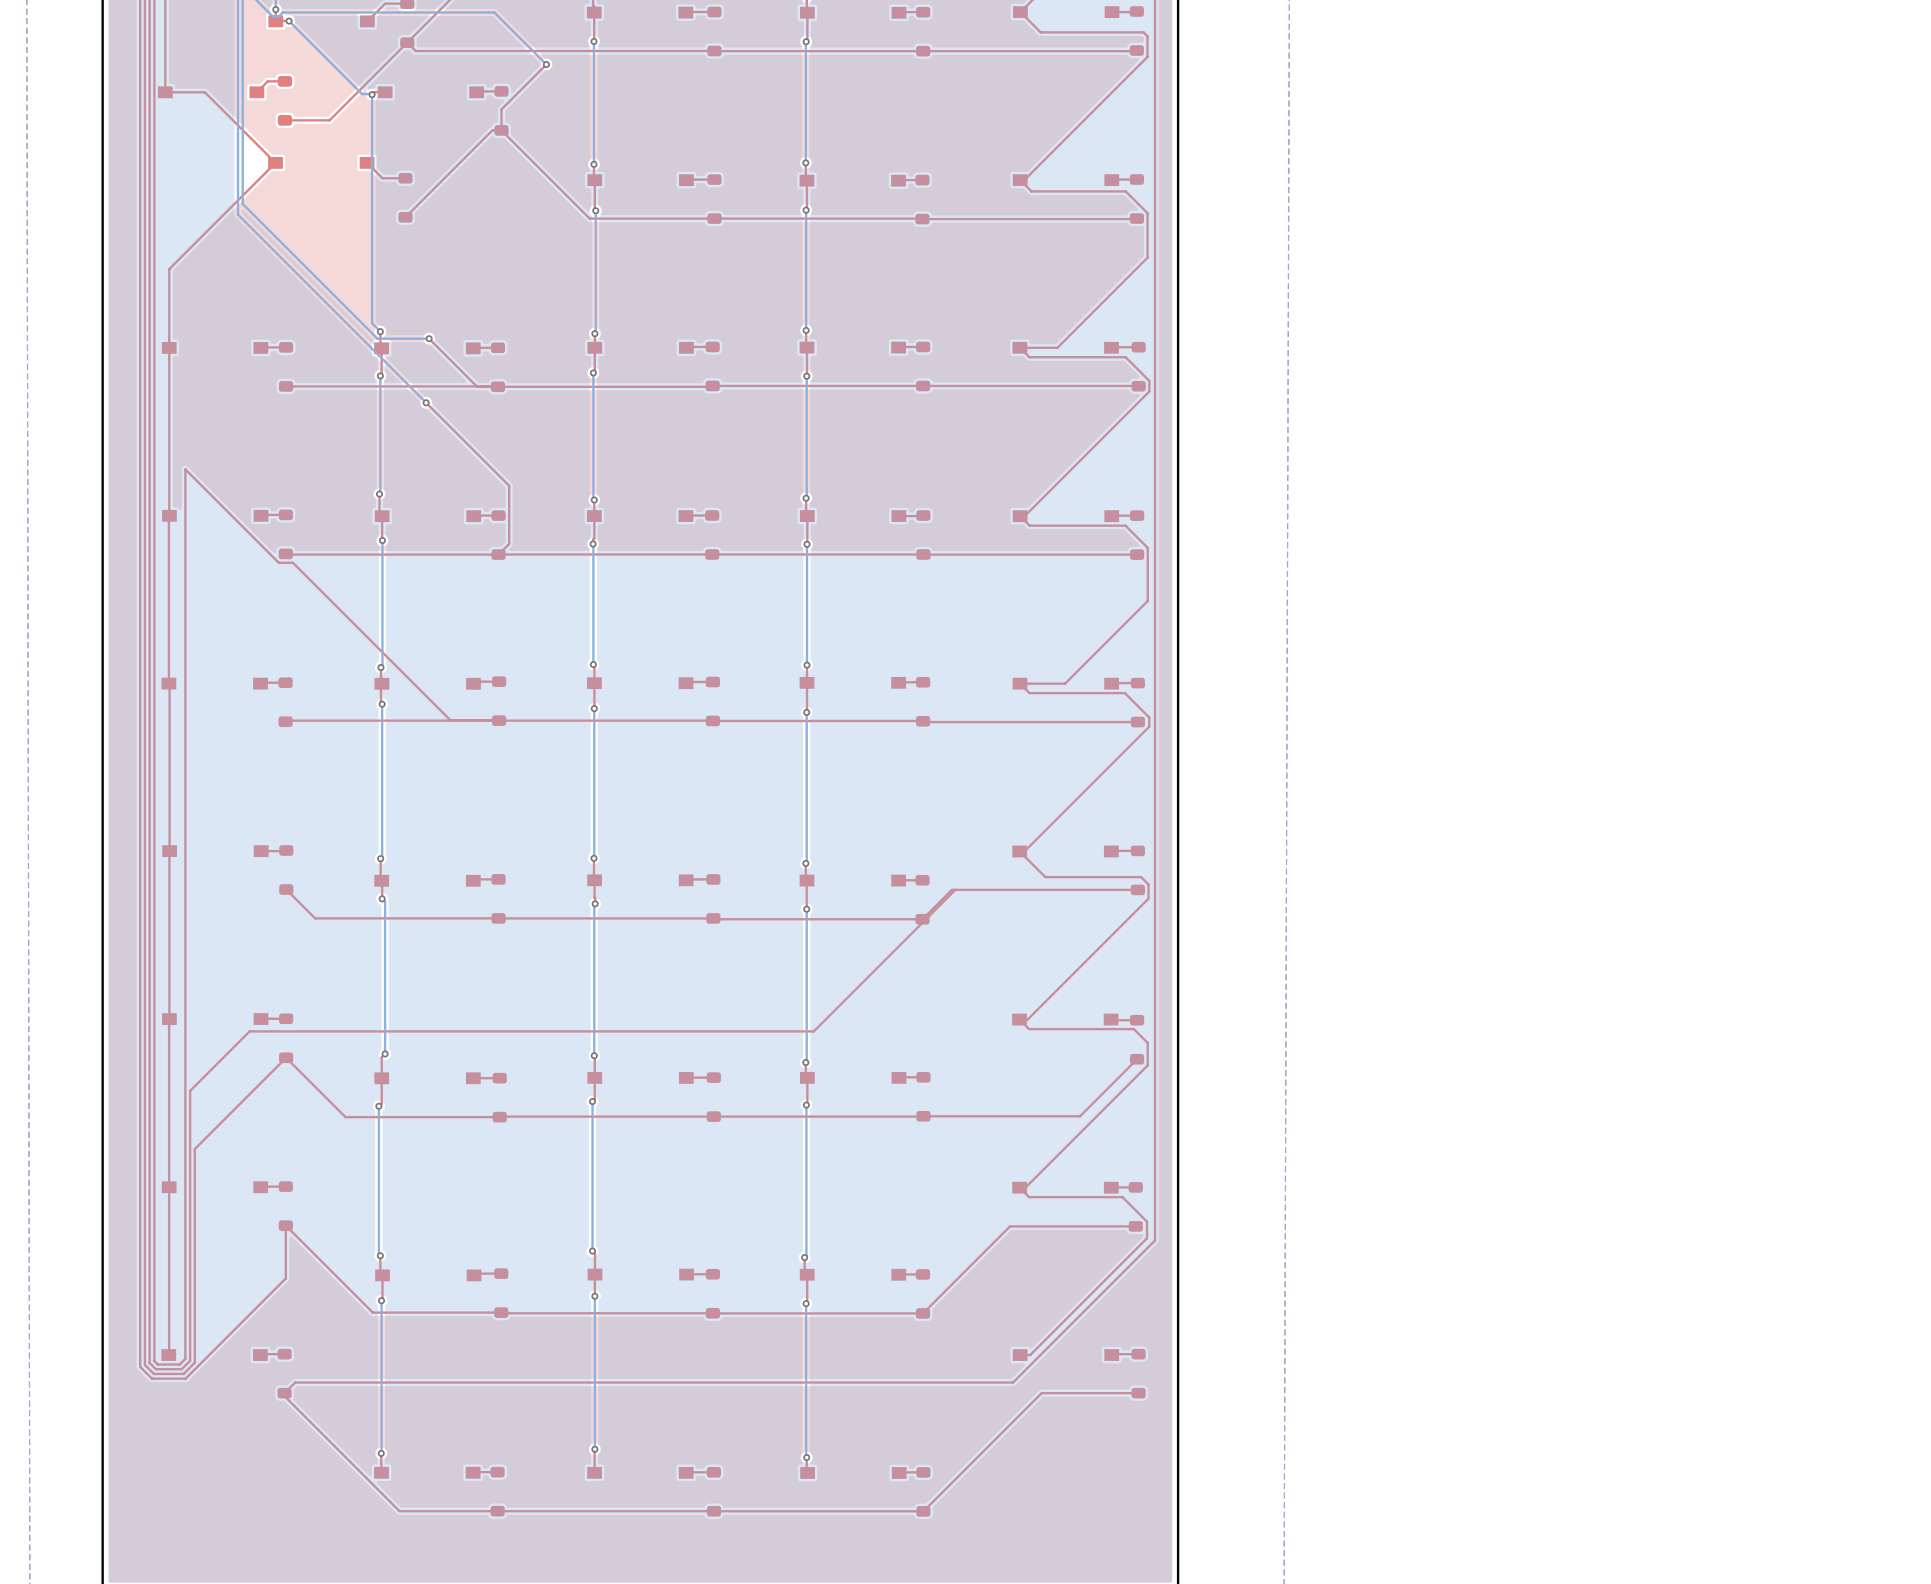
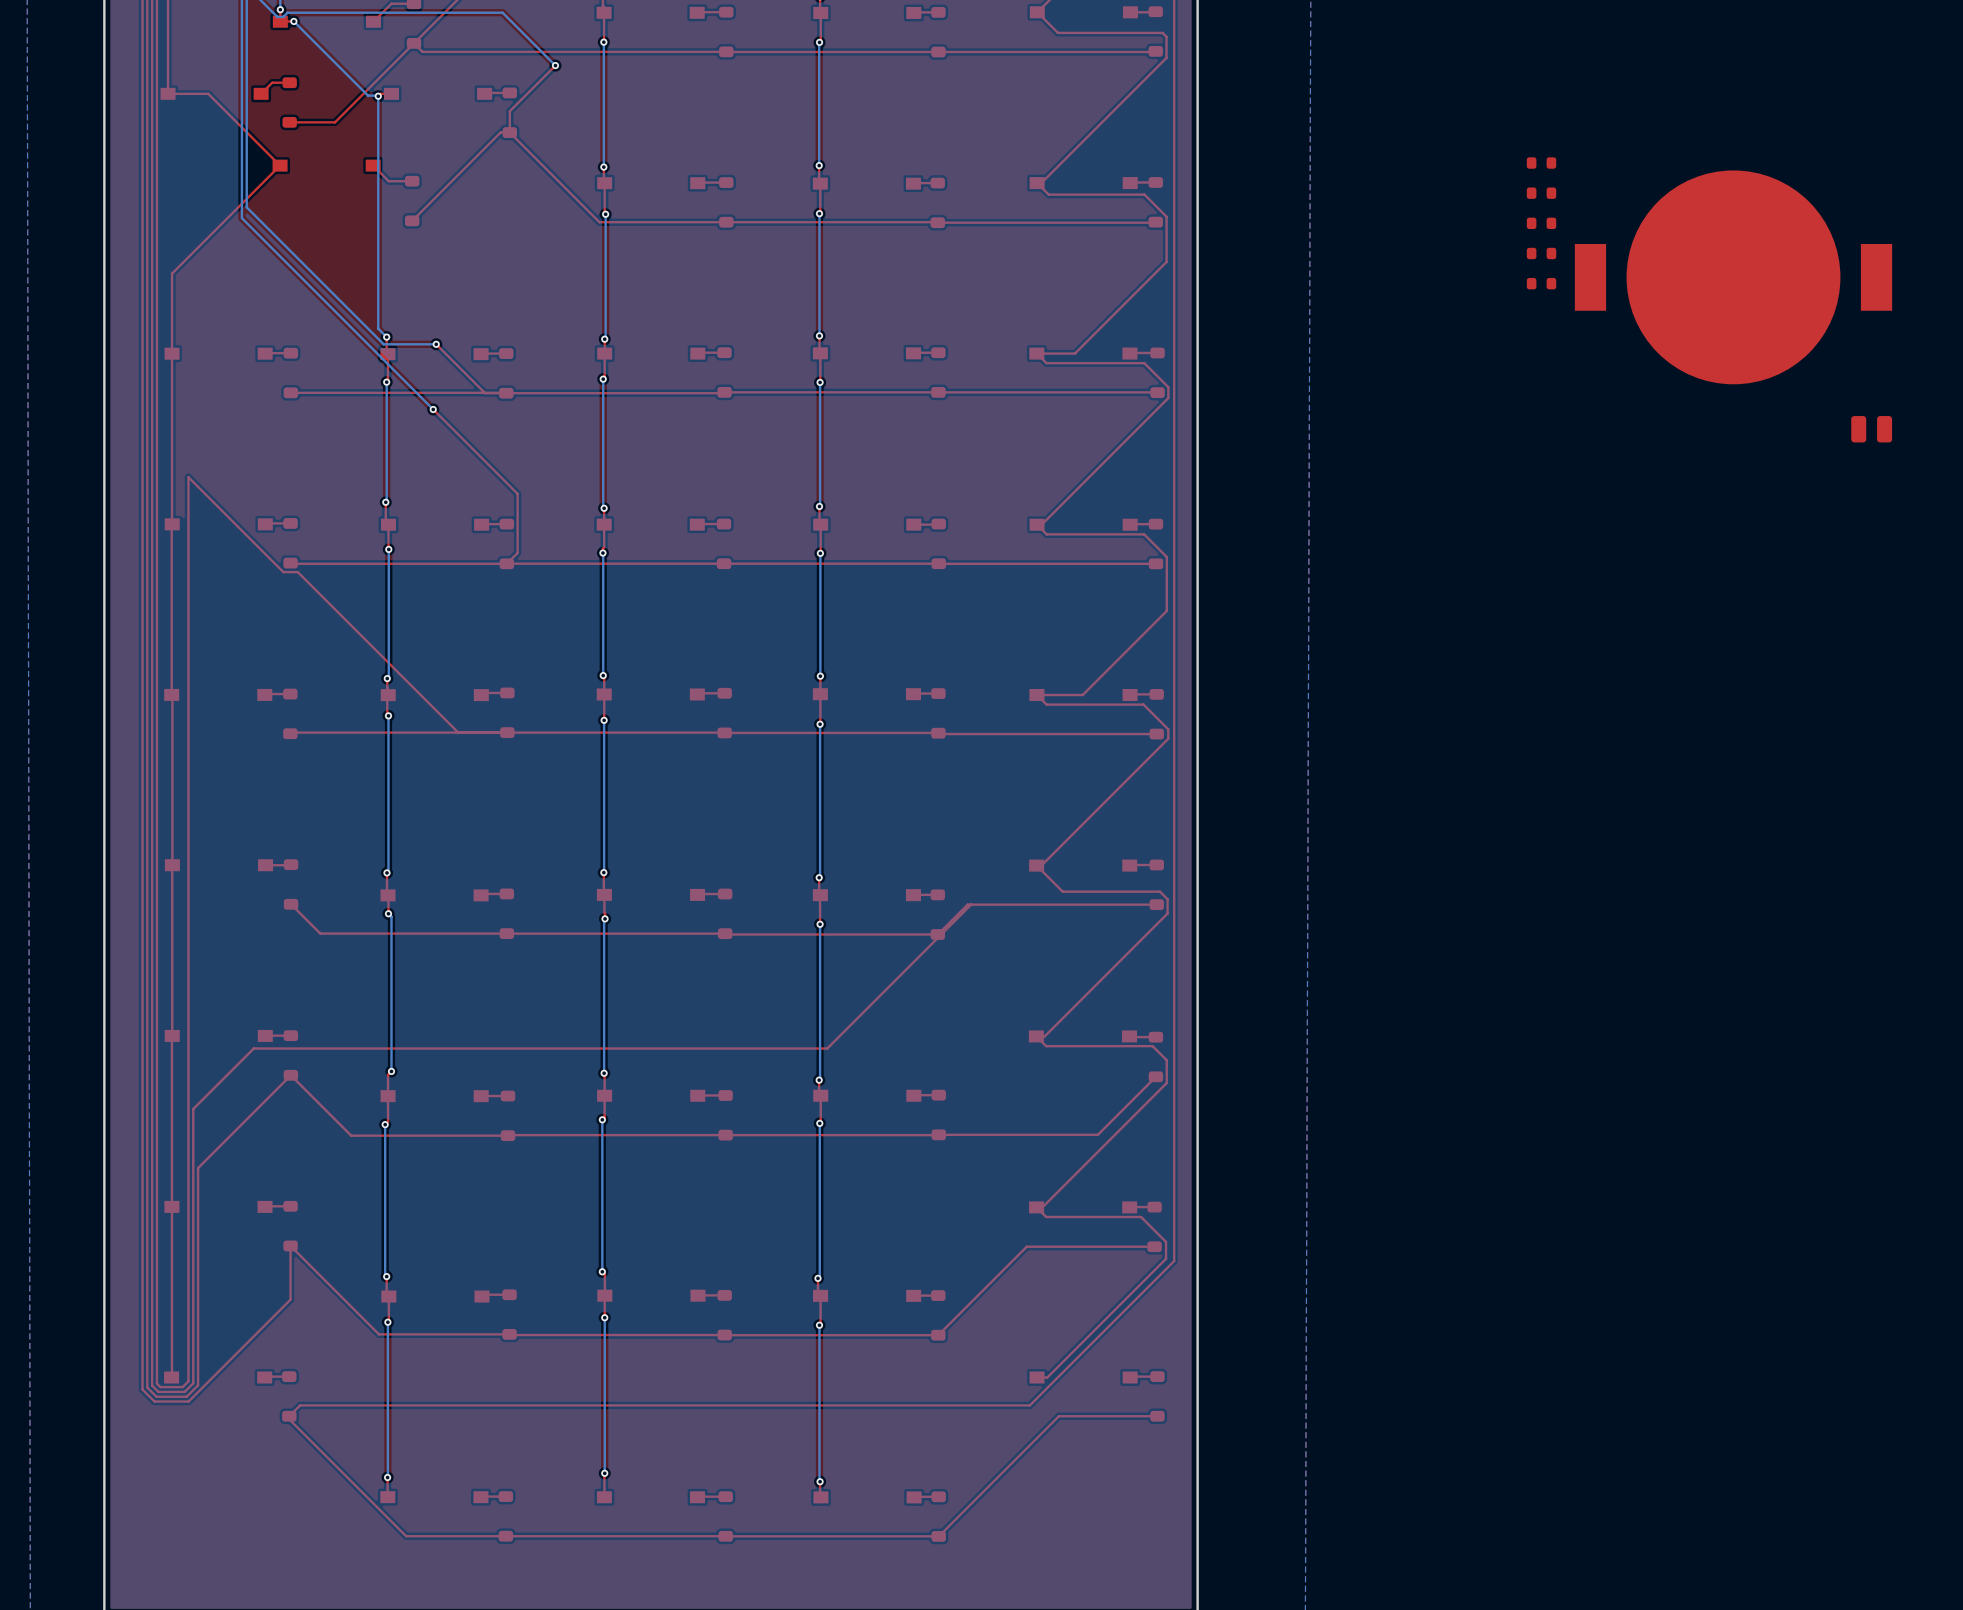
part: none -> (1541, 163)
part: none -> (1541, 193)
part: none -> (1541, 223)
part: none -> (1541, 253)
part: none -> (1733, 277)
part: none -> (1541, 283)
part: none -> (1871, 429)

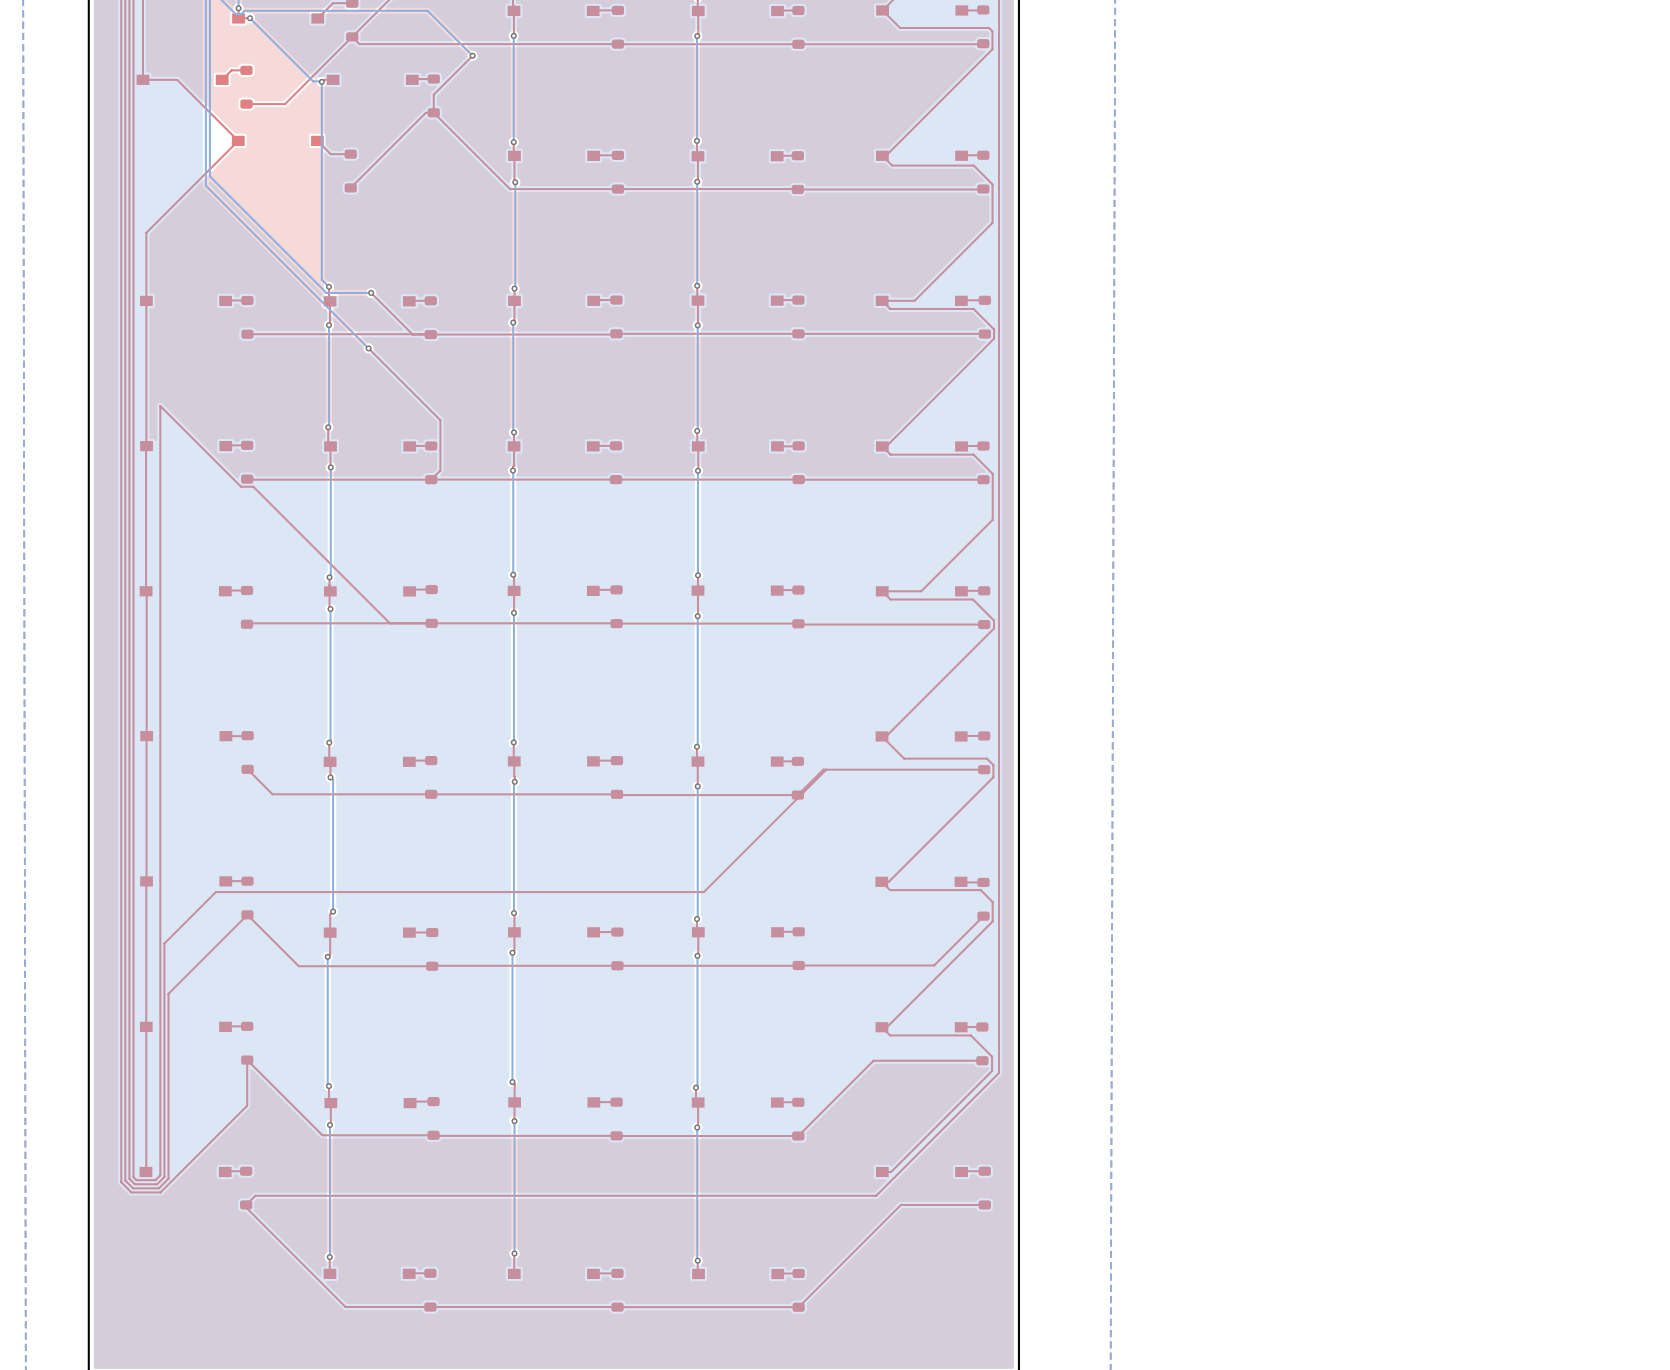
part: (1541, 163) -> none
part: (1541, 193) -> none
part: (1541, 223) -> none
part: (1541, 253) -> none
part: (1733, 277) -> none
part: (1541, 283) -> none
part: (1871, 429) -> none

